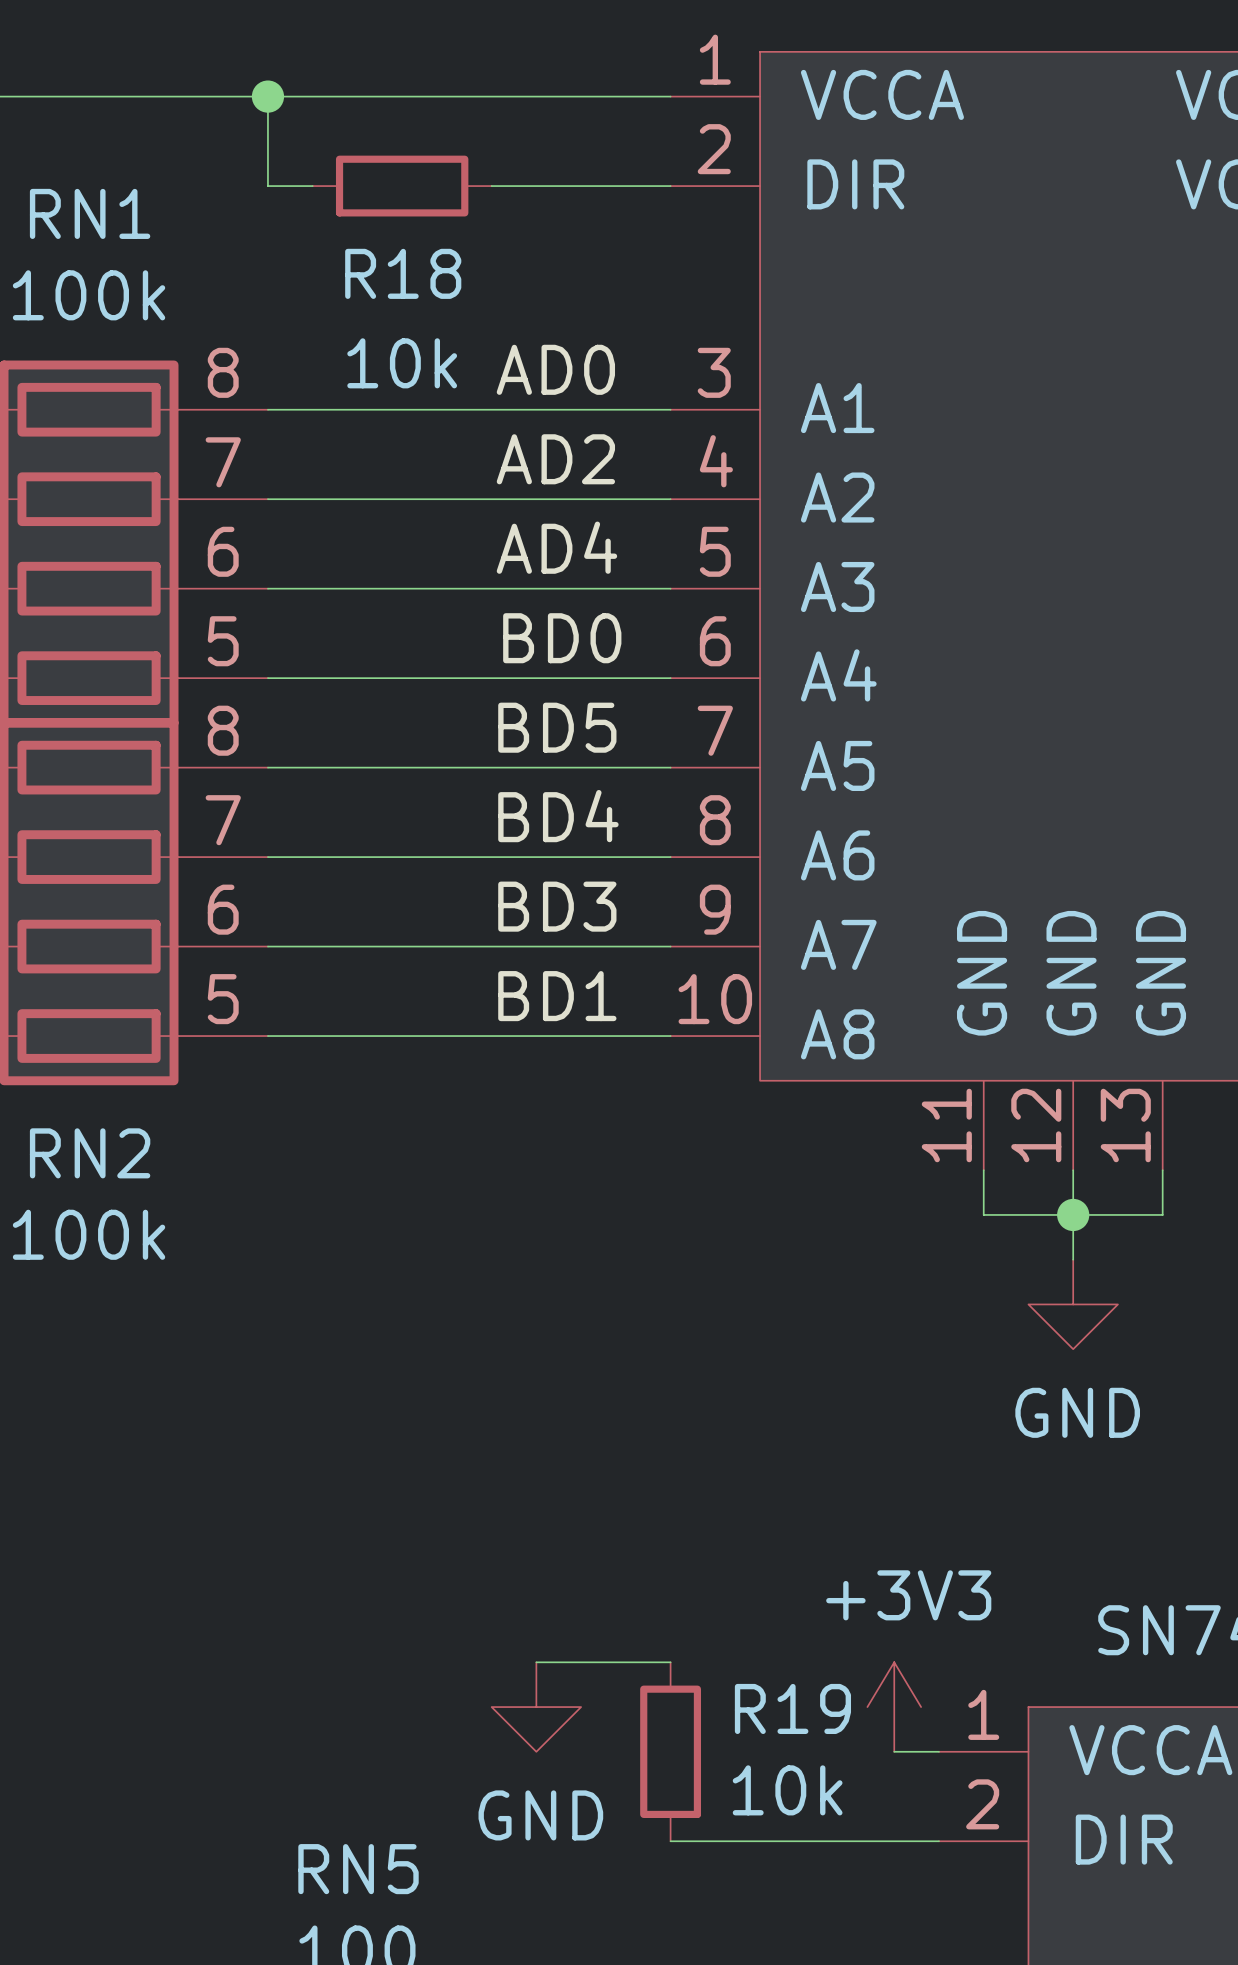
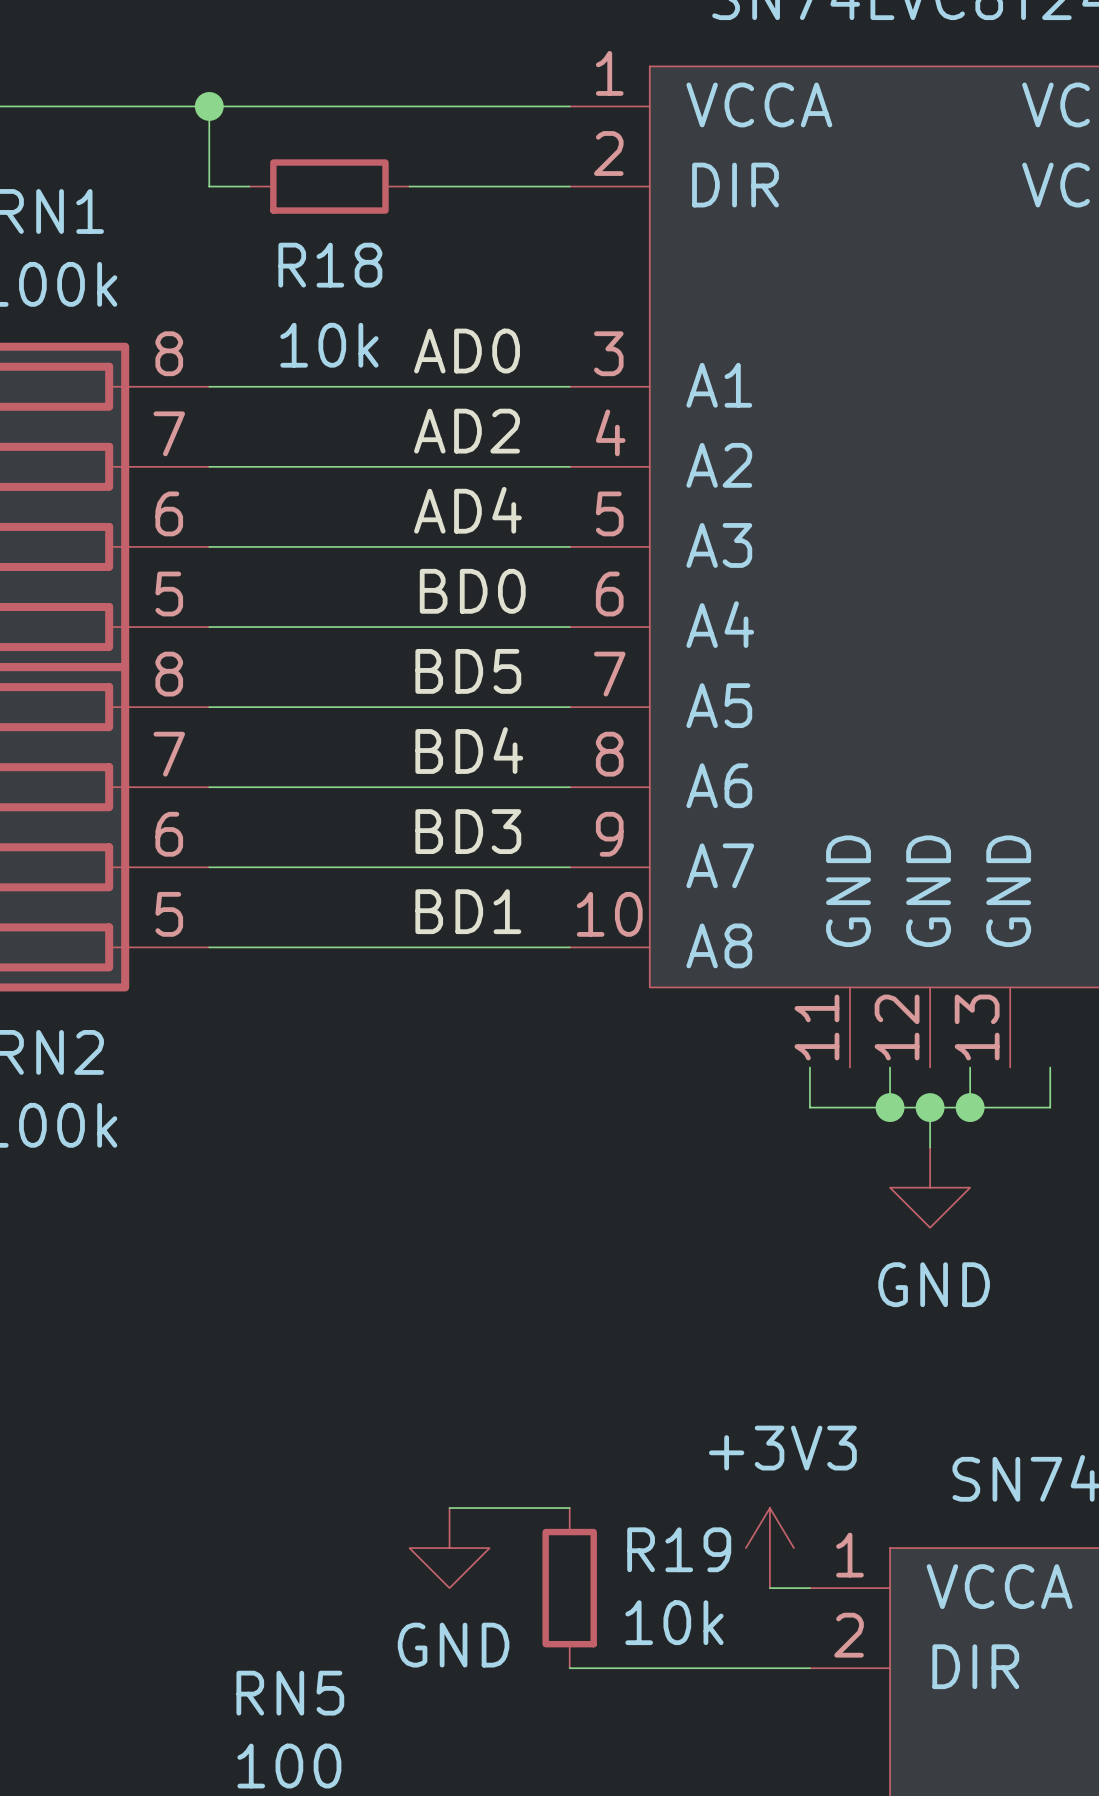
wire: (983, 1170) (983, 1214) -> (809, 1067) (809, 1107) (850, 1107)
wire: (1073, 1170) (1073, 1214) -> (890, 1067) (890, 1107)
wire: none -> (970, 1067) (970, 1107)
wire: (1162, 1170) (1162, 1214) -> (1050, 1067) (1050, 1107) (1010, 1107)
junction: none -> (890, 1107)
junction: none -> (970, 1107)

